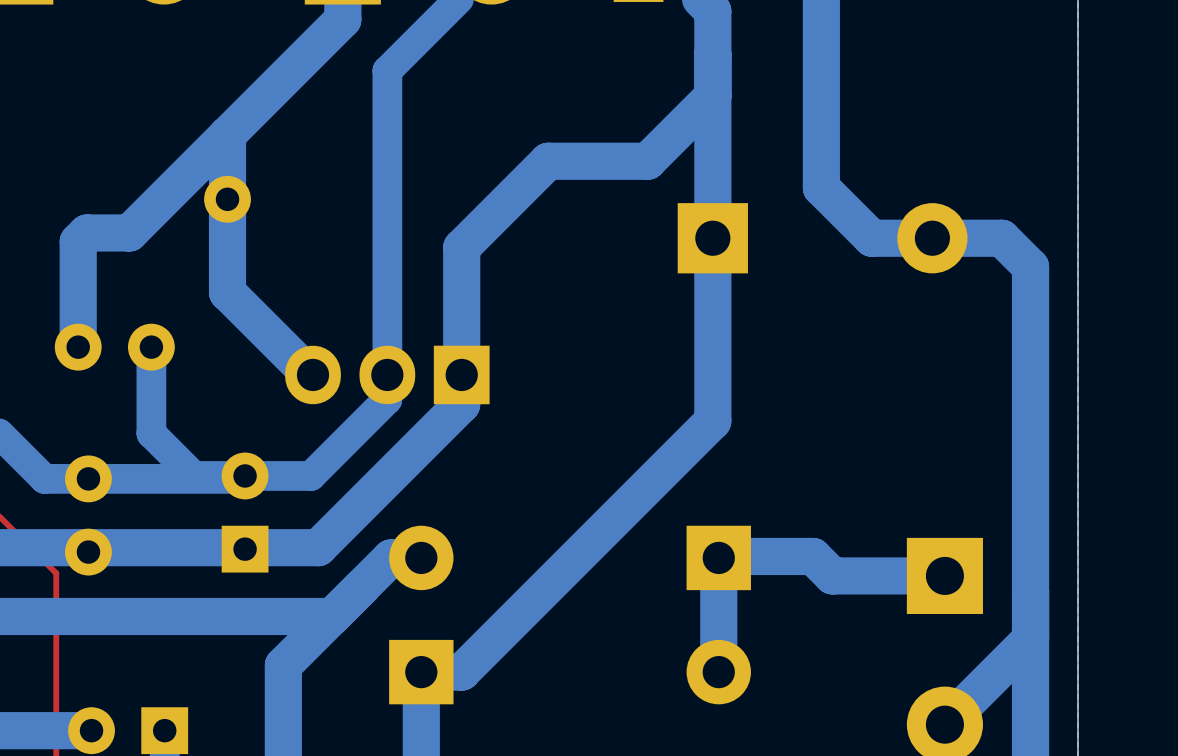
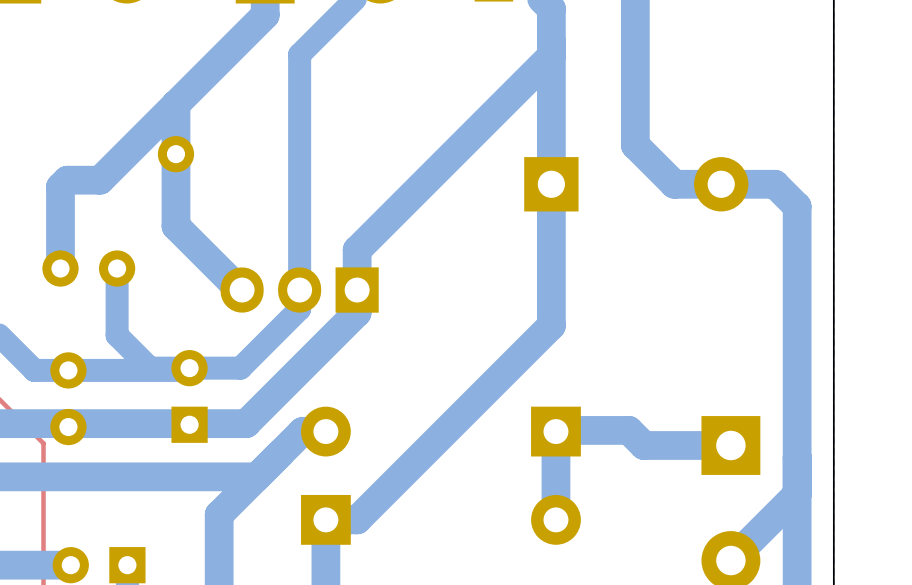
bottom track: (712, 96) (647, 161) (548, 161) (461, 247) (461, 323) -> (551, 55) (357, 250)

